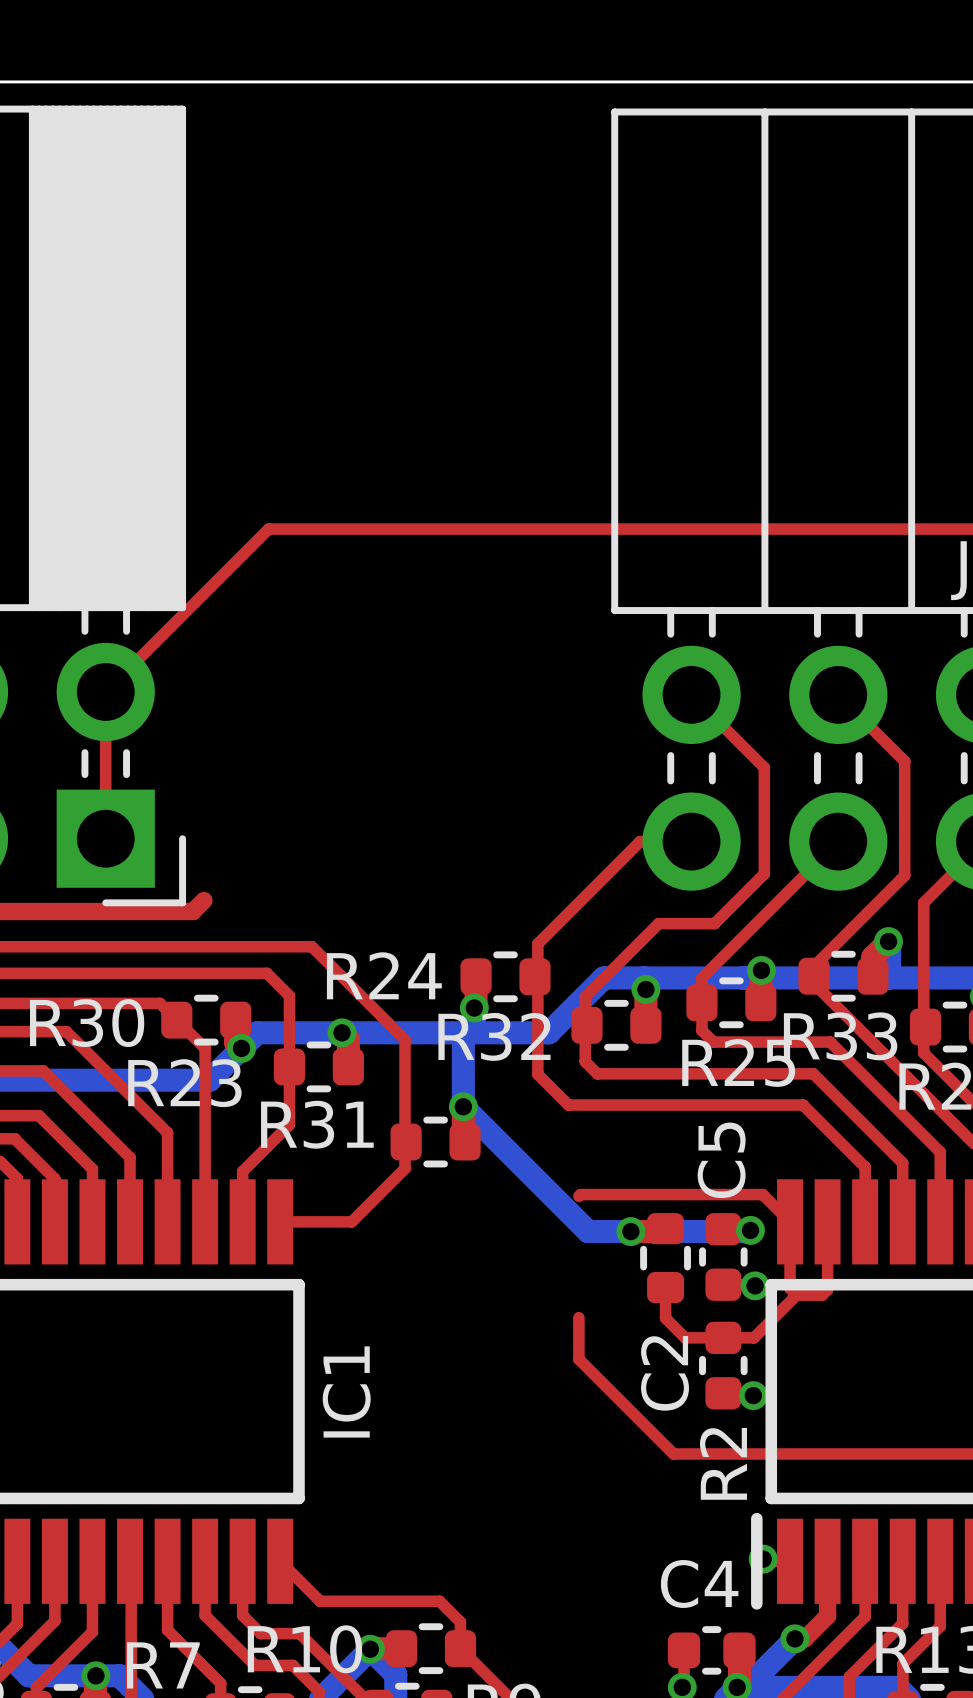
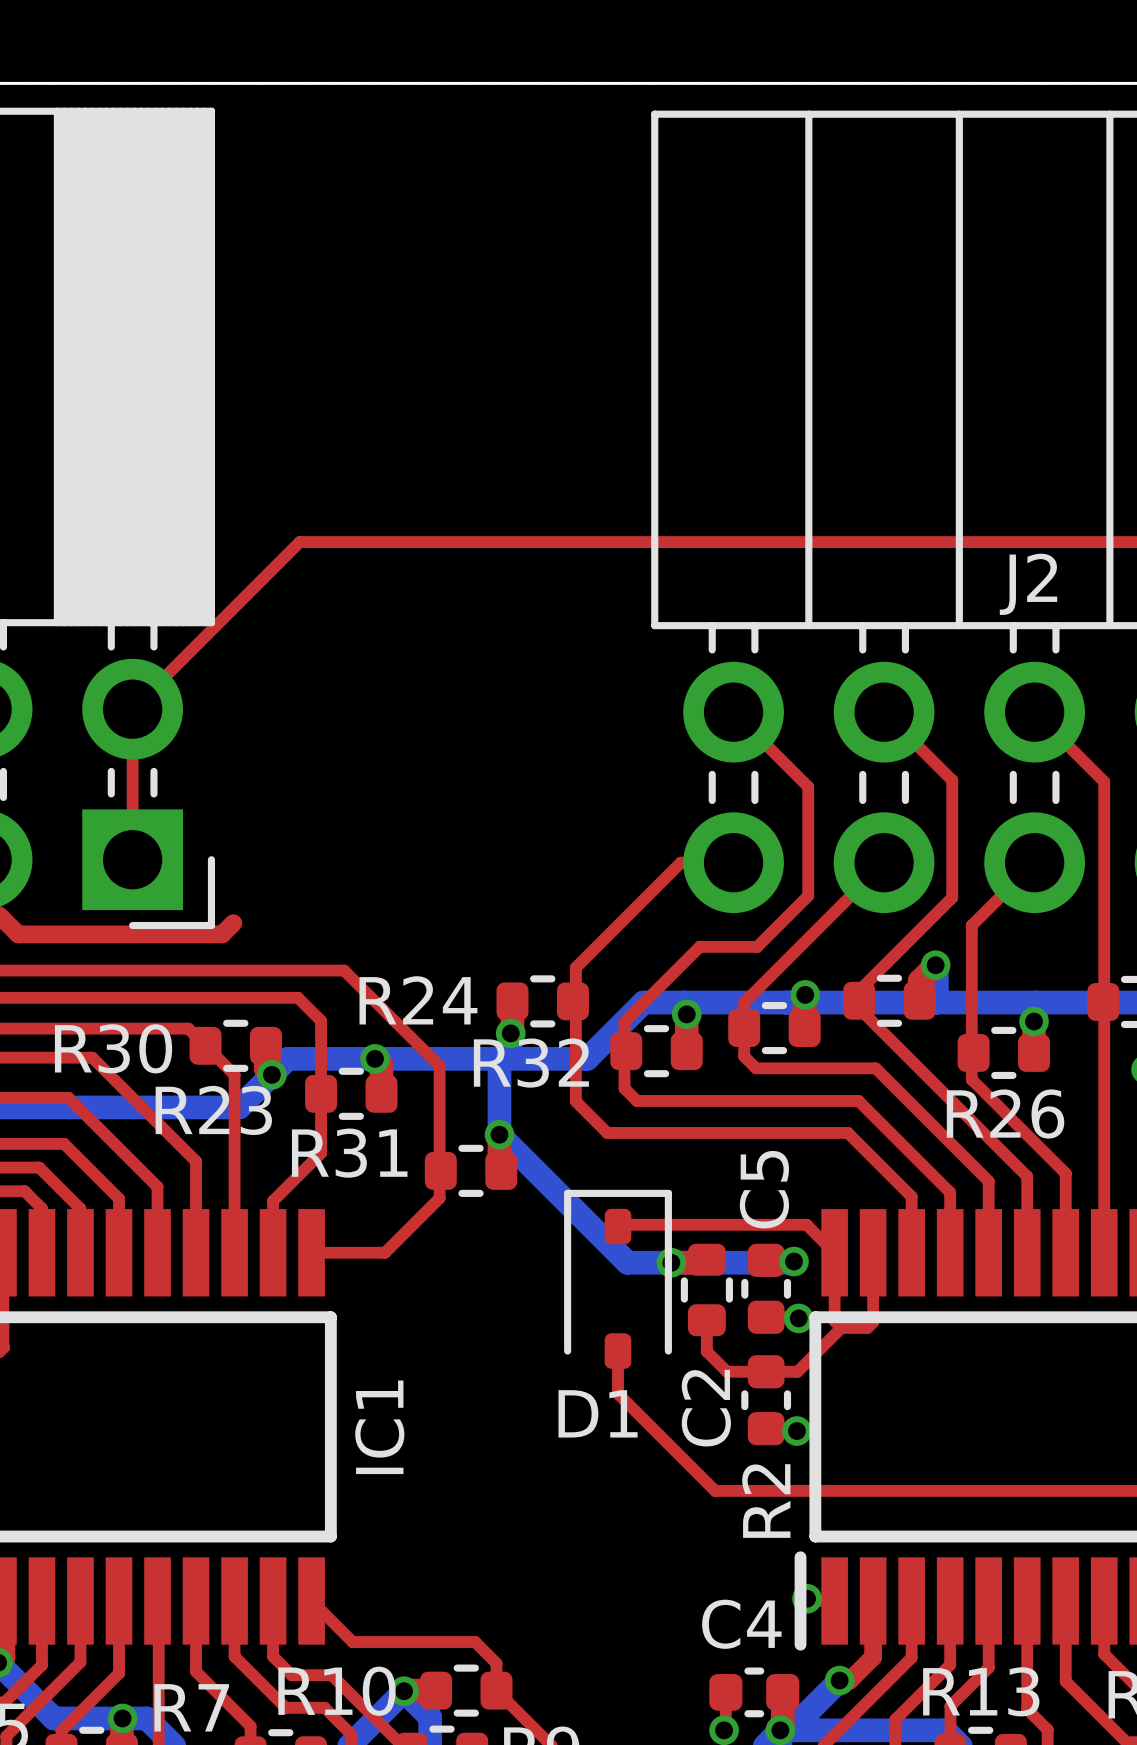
R33 name: R33 (840, 1036) -> none
R25 name: R25 (738, 1062) -> none
D1: none -> (618, 1279)

